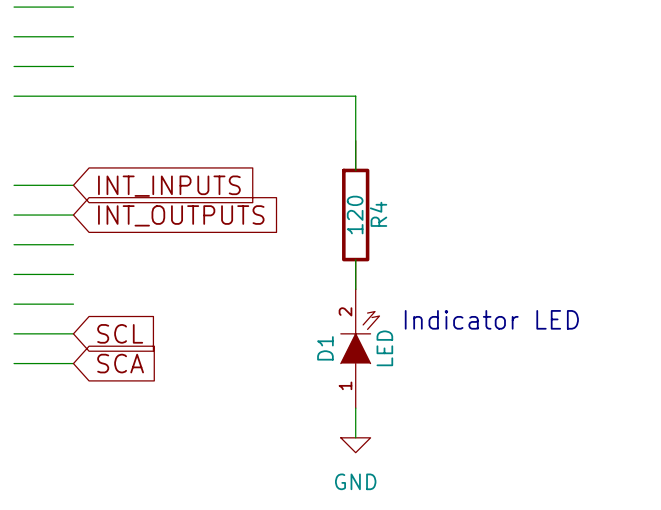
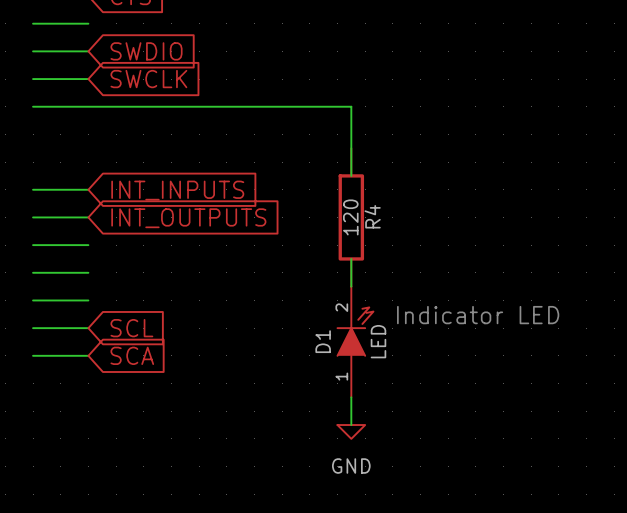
global label: none -> SWDIO (146, 51)
global label: none -> SWCLK (148, 79)

